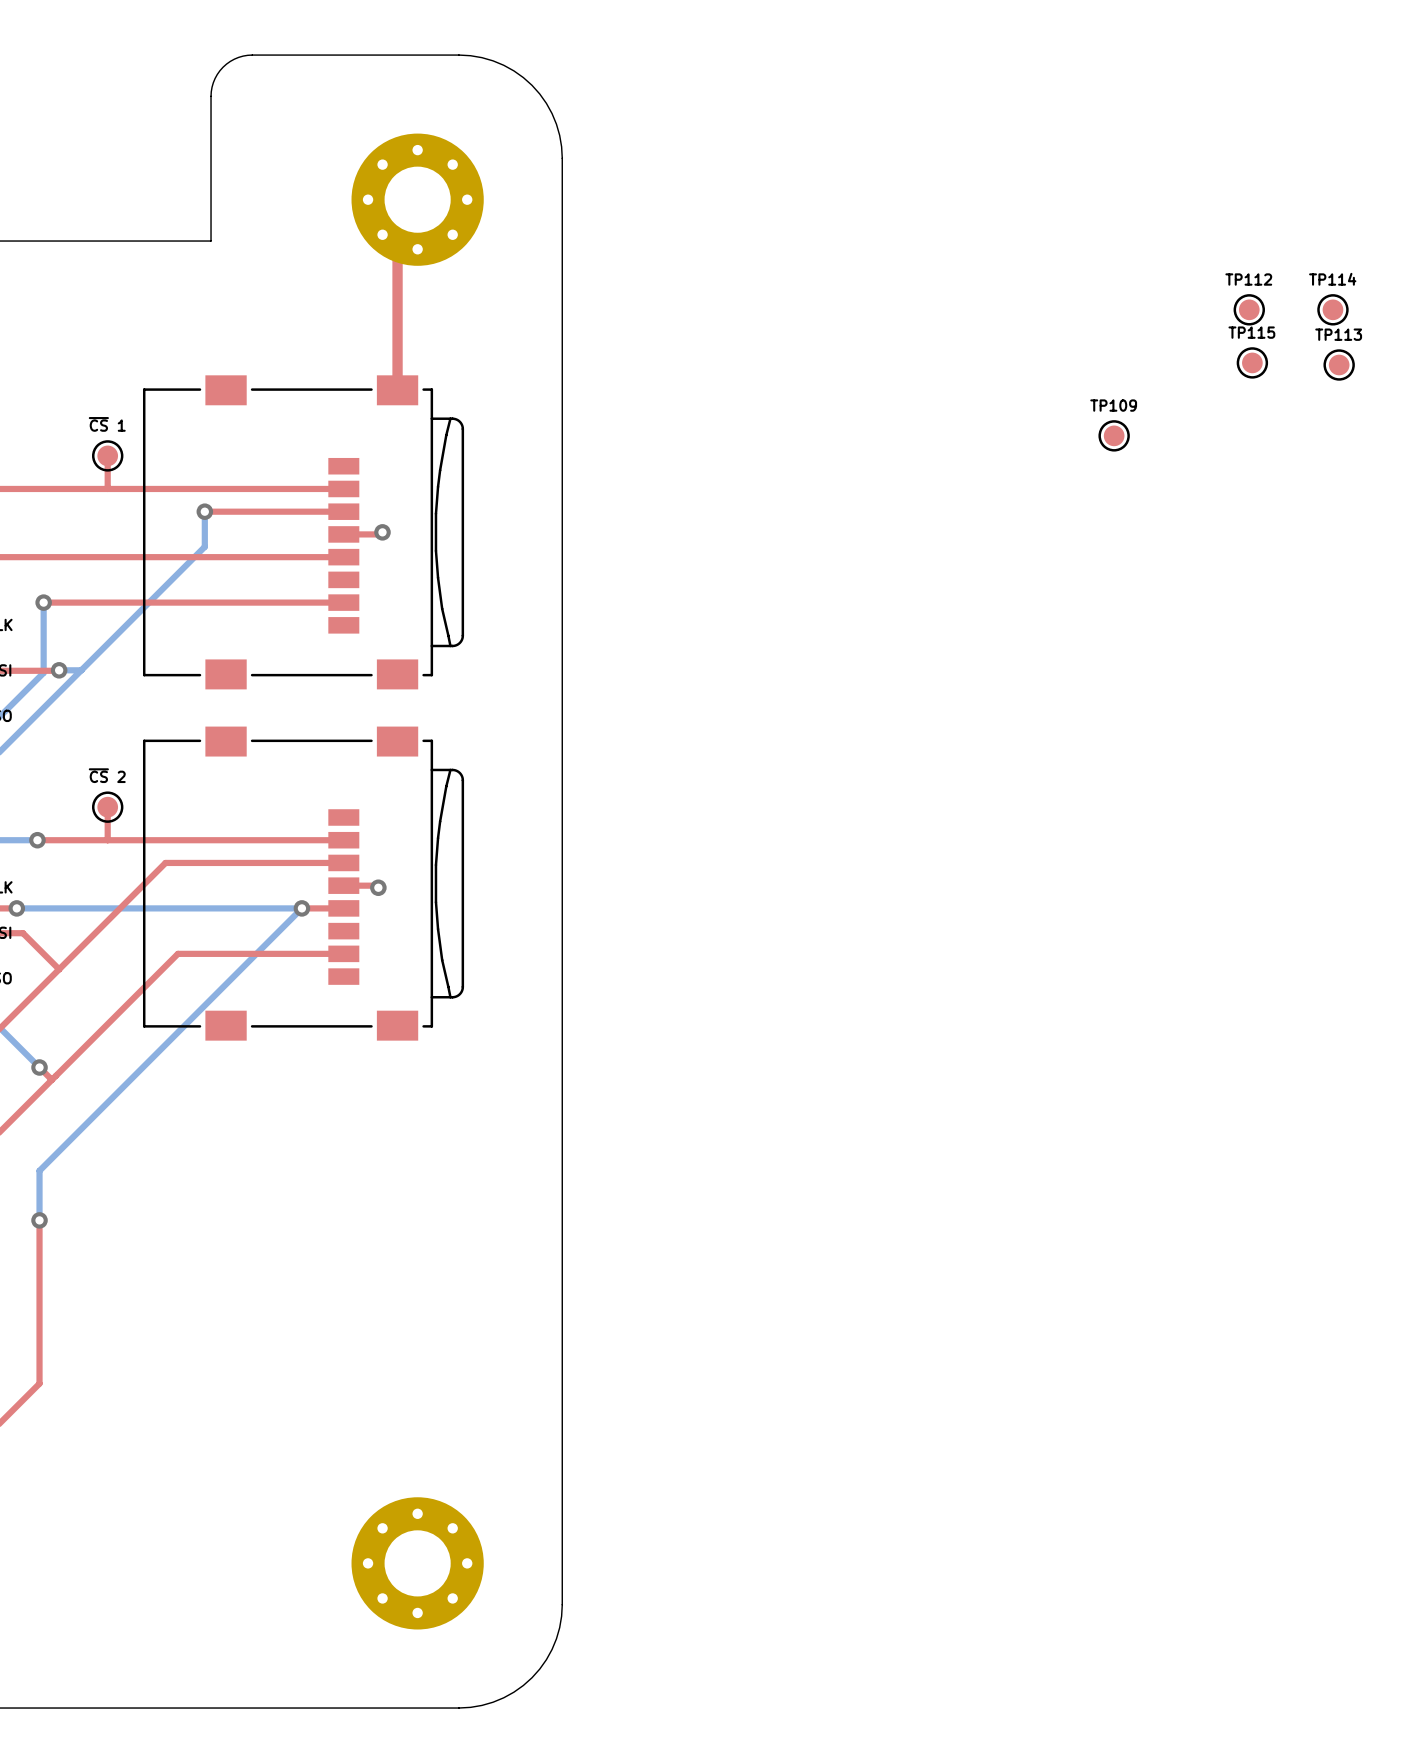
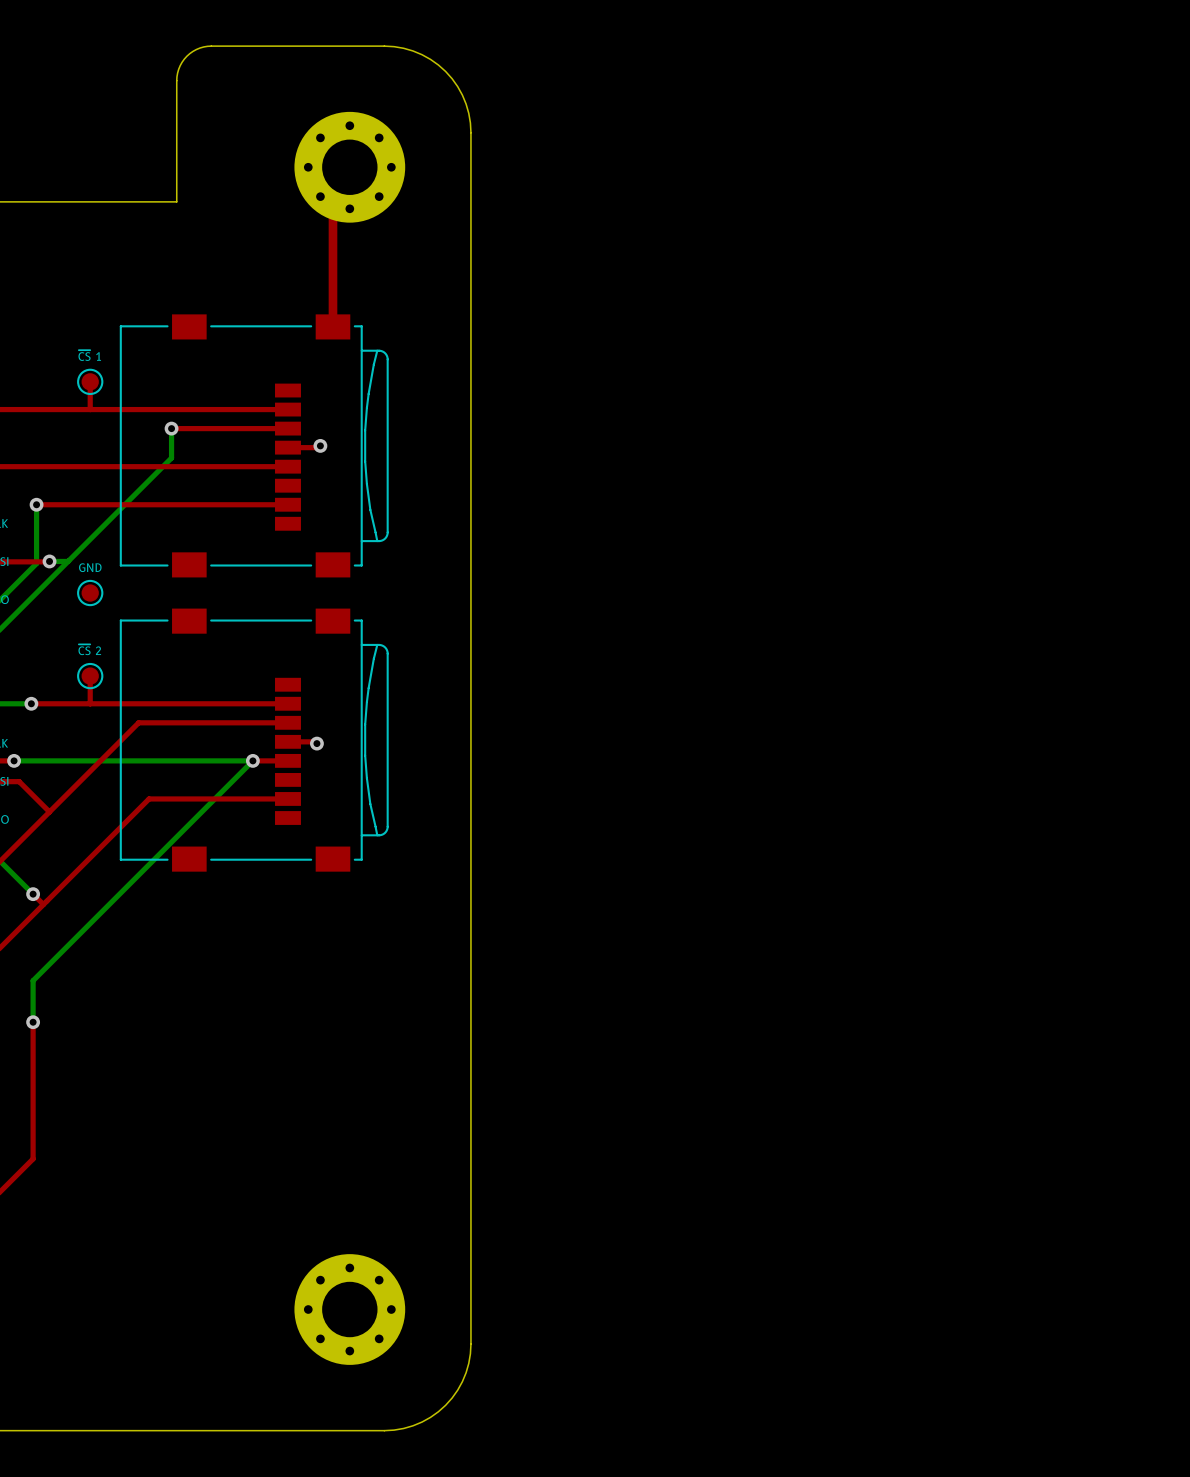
TP112: (1249, 309) -> none
TP114: (1332, 309) -> none
TP115: (1252, 362) -> none
TP113: (1339, 364) -> none
TP109: (1114, 435) -> none
GND: none -> (90, 593)

